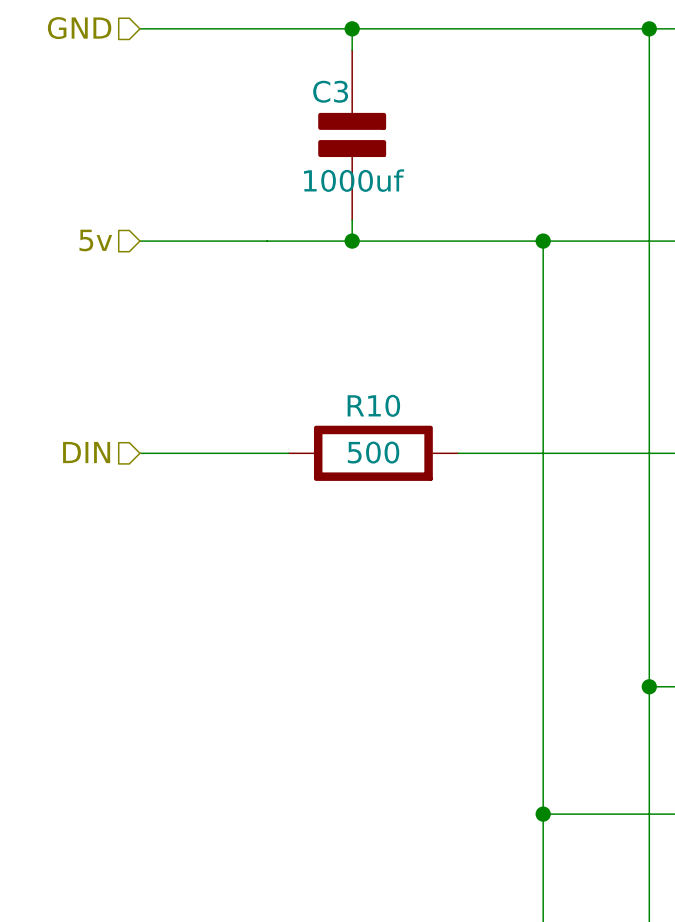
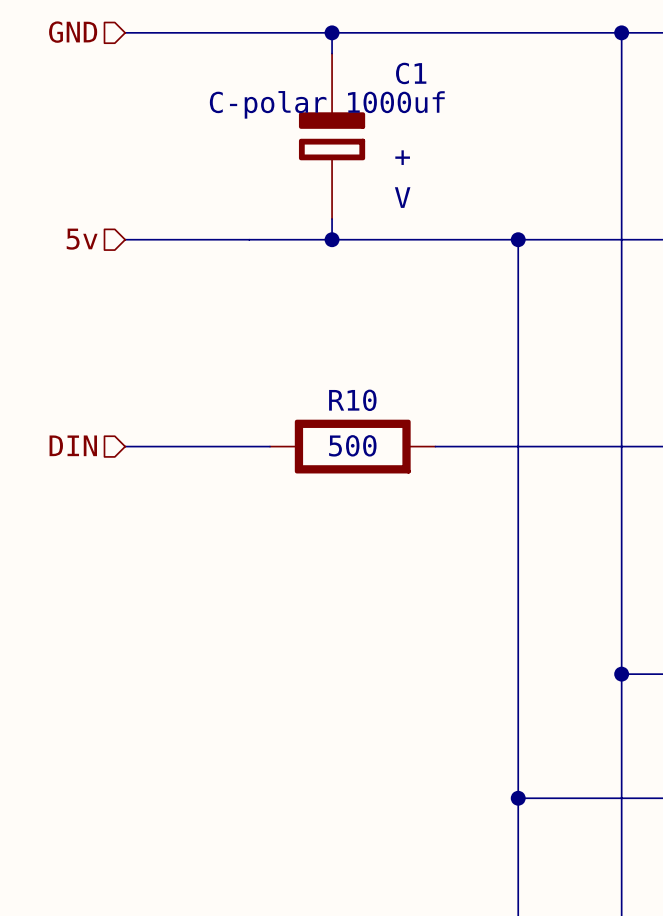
C3: 1000uf (352, 134) -> none
C1: none -> C-polar 1000uf (332, 136)

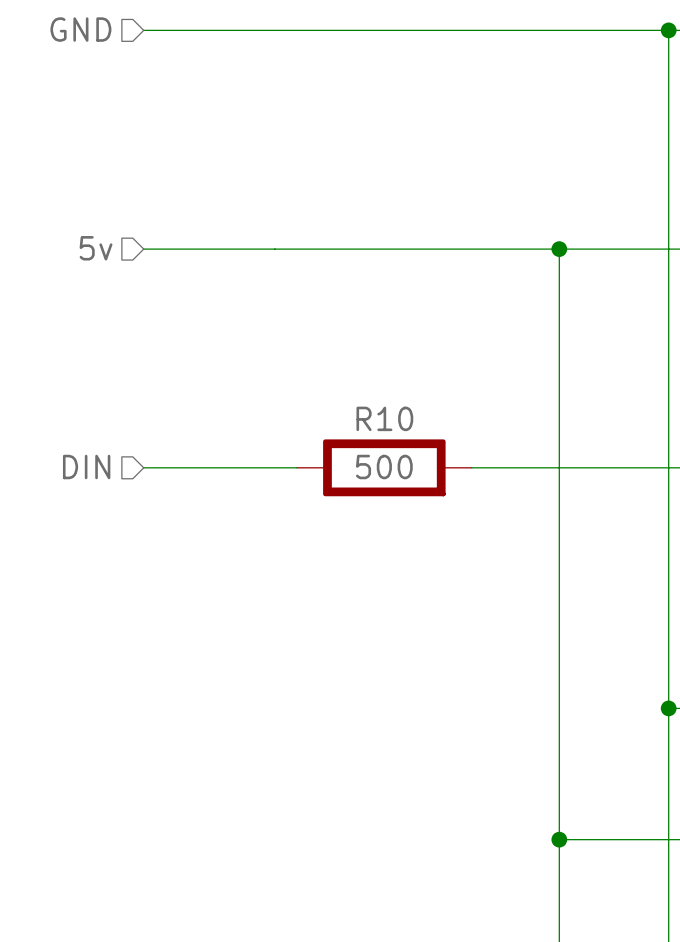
wire: (332, 32) (332, 53) -> none
junction: (332, 32) -> none
C1: C-polar 1000uf (332, 136) -> none
wire: (332, 219) (332, 239) -> none
junction: (332, 239) -> none

